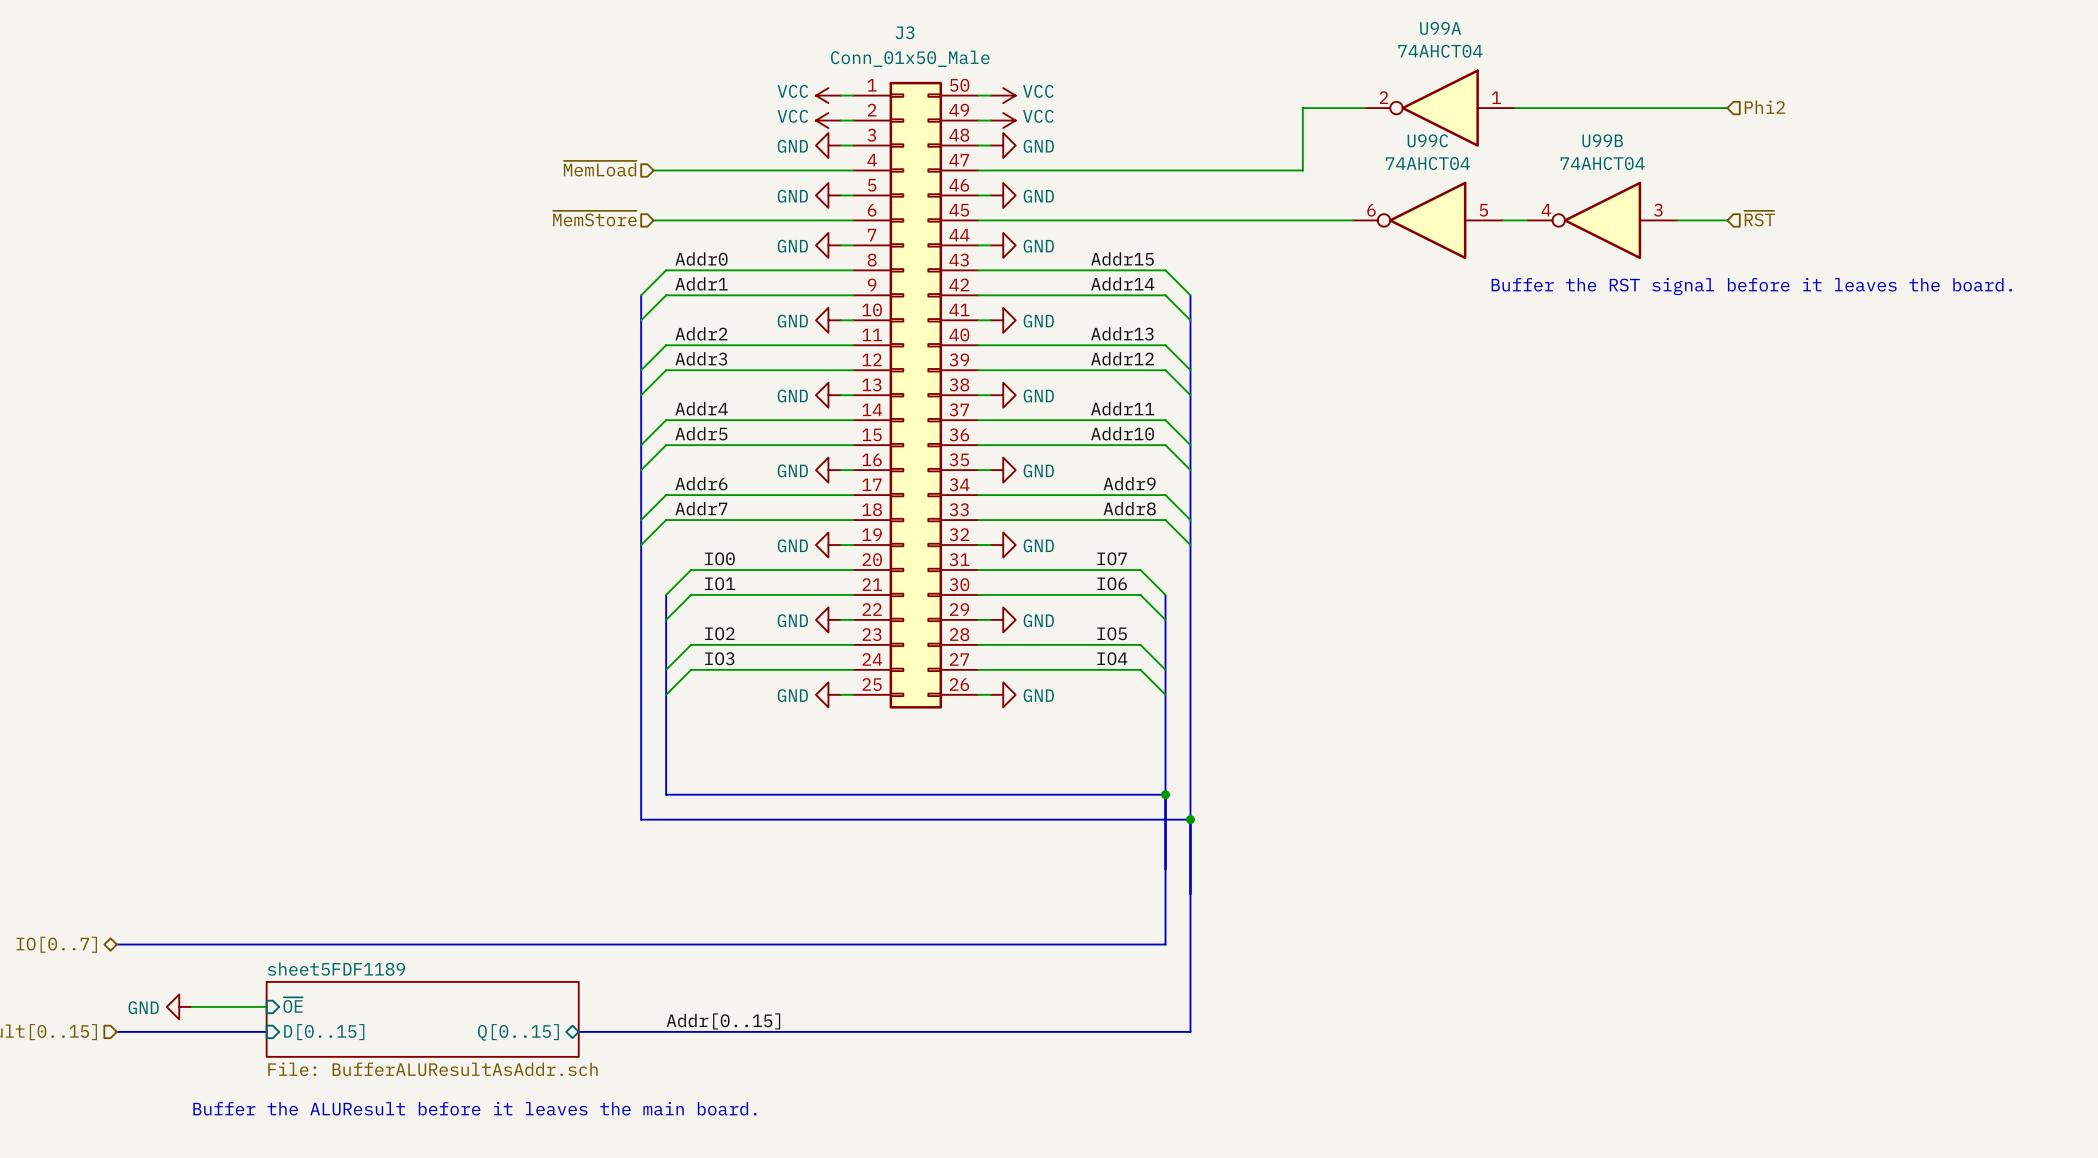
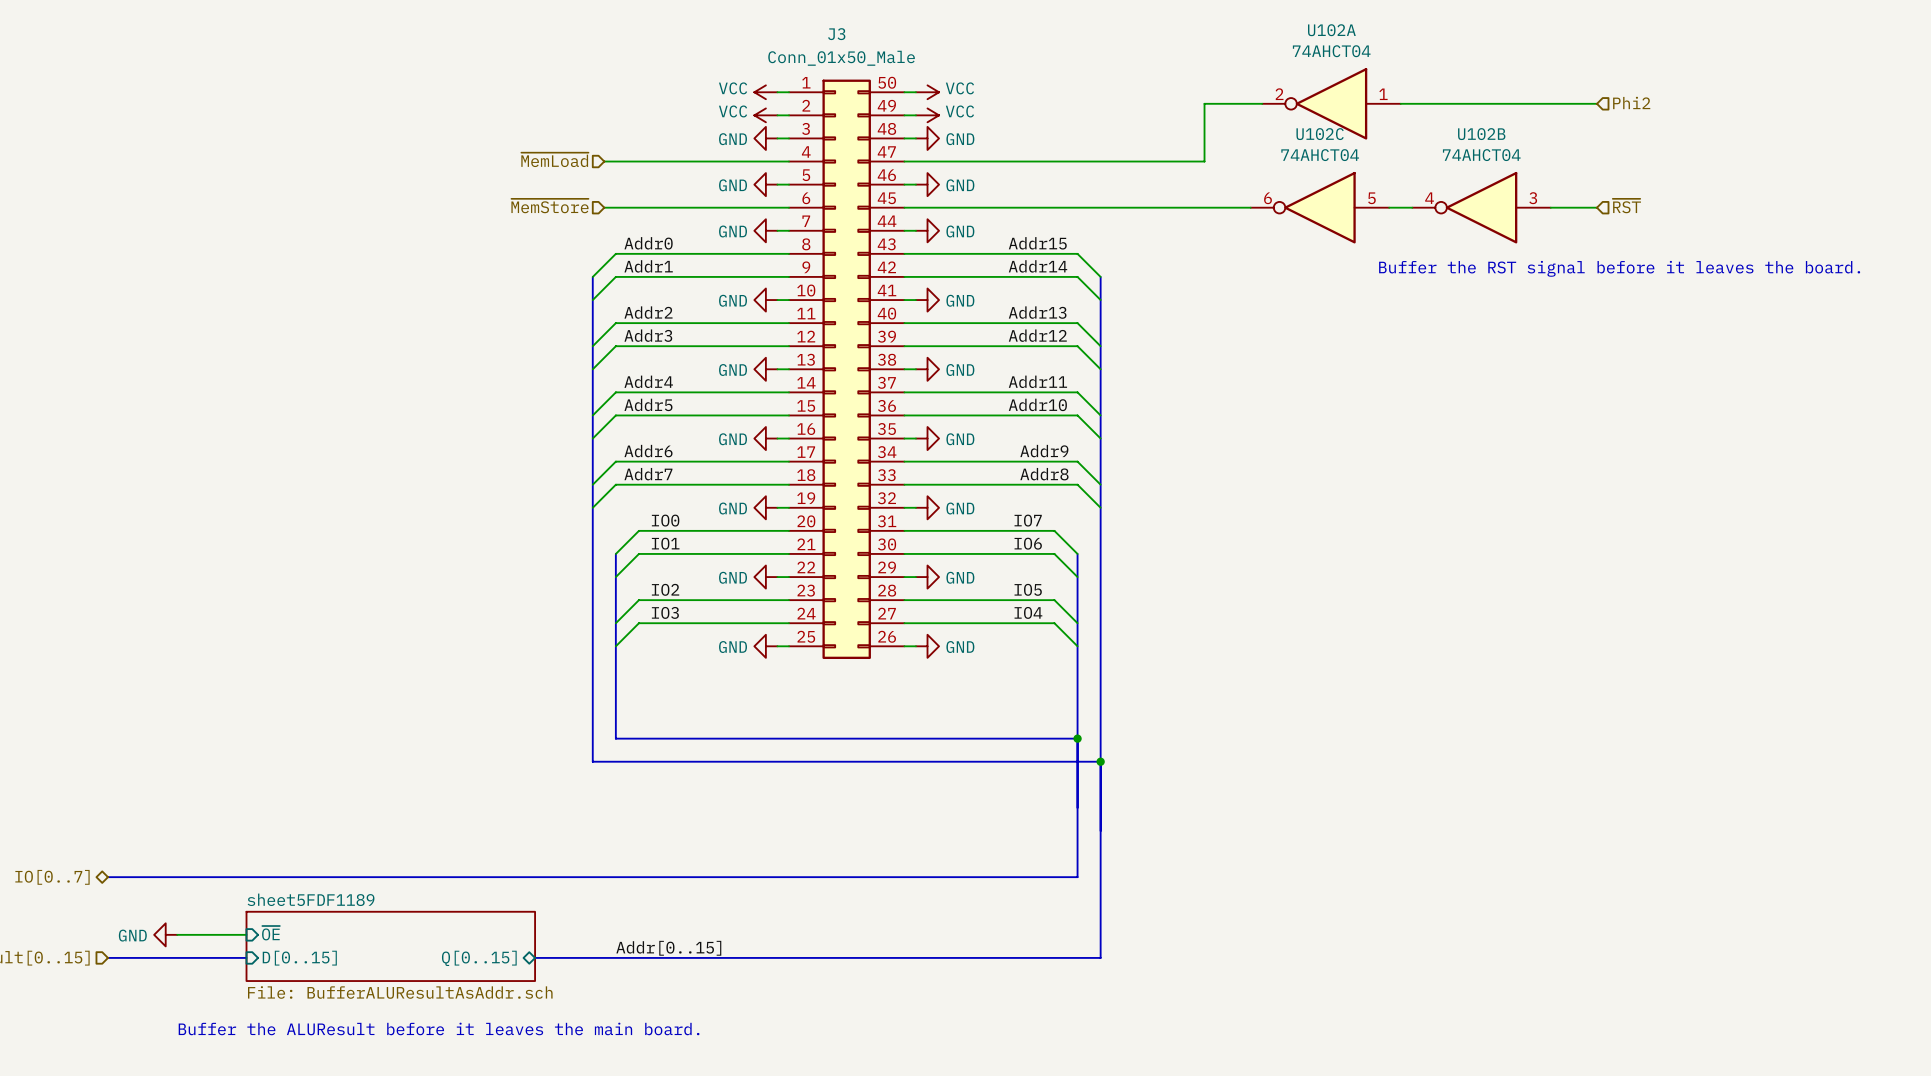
U99A name: U99A (1440, 28) -> U102A (1331, 30)
U99C name: U99C (1427, 140) -> U102C (1320, 134)
U99B name: U99B (1602, 140) -> U102B (1481, 134)

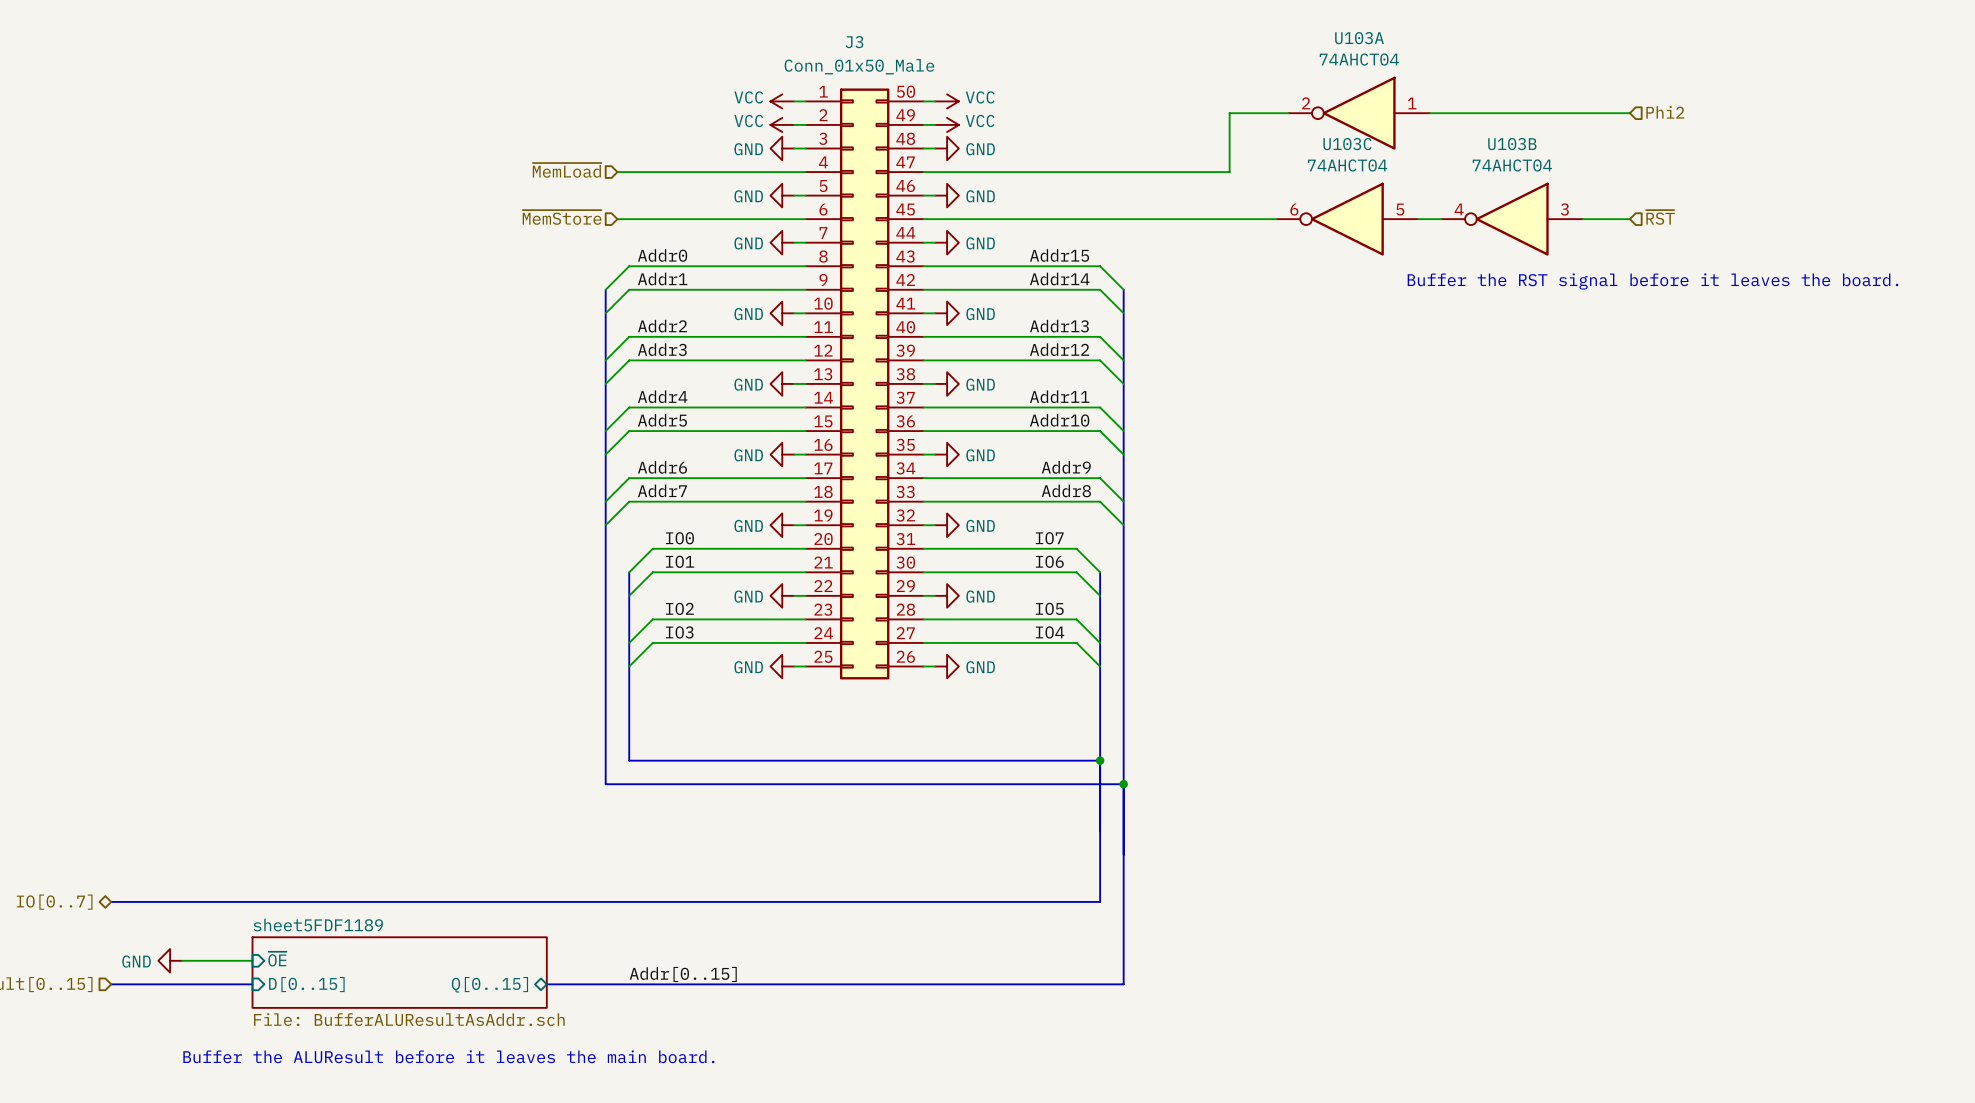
U102A name: U102A (1331, 30) -> U103A (1359, 38)
U102C name: U102C (1320, 134) -> U103C (1347, 144)
U102B name: U102B (1481, 134) -> U103B (1512, 144)

